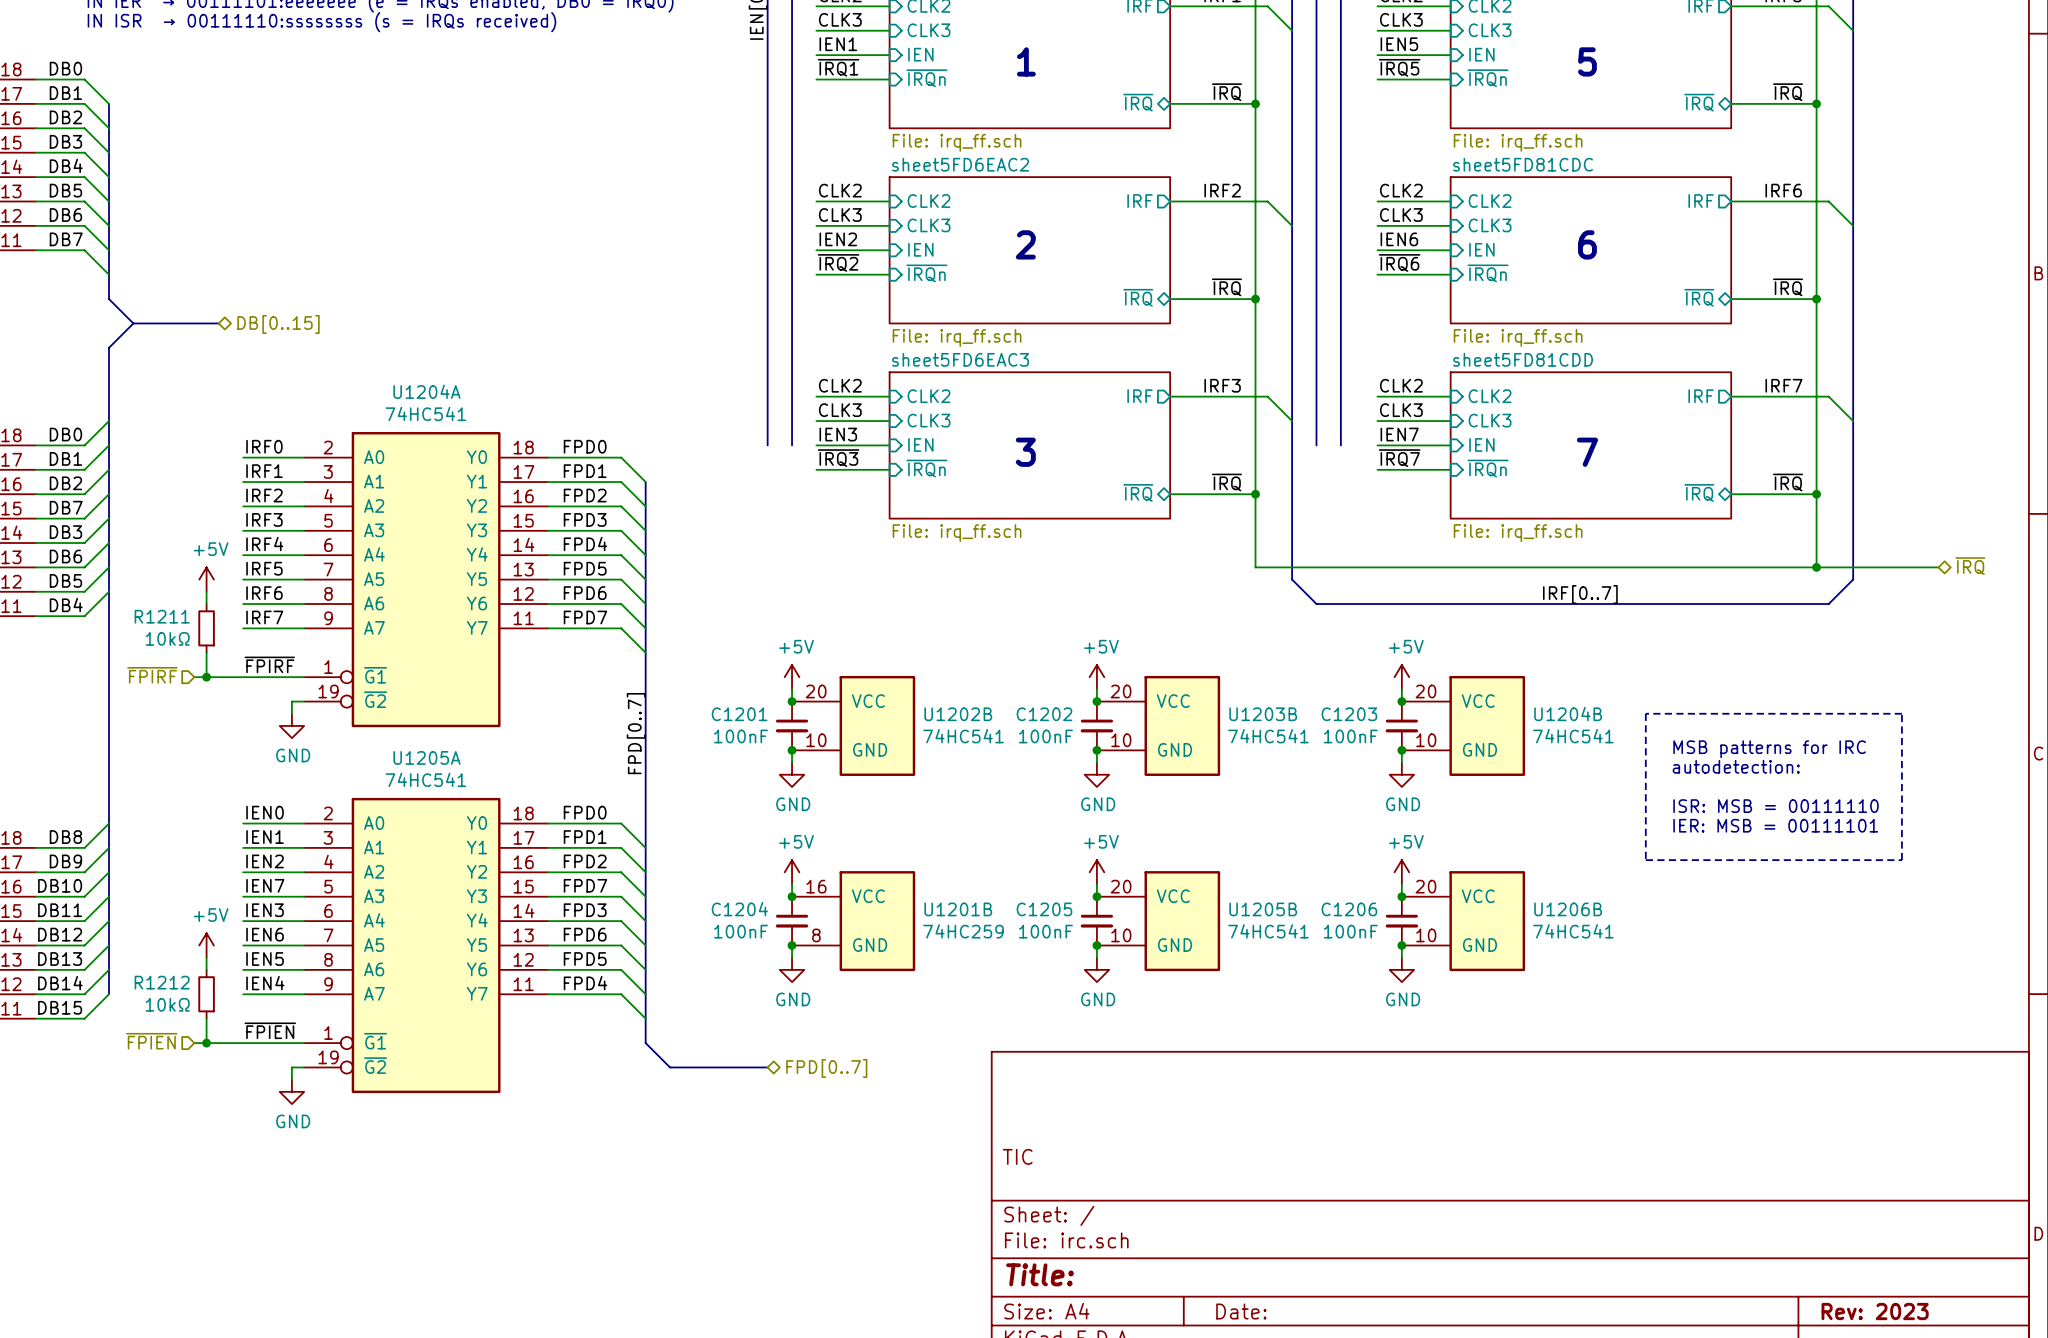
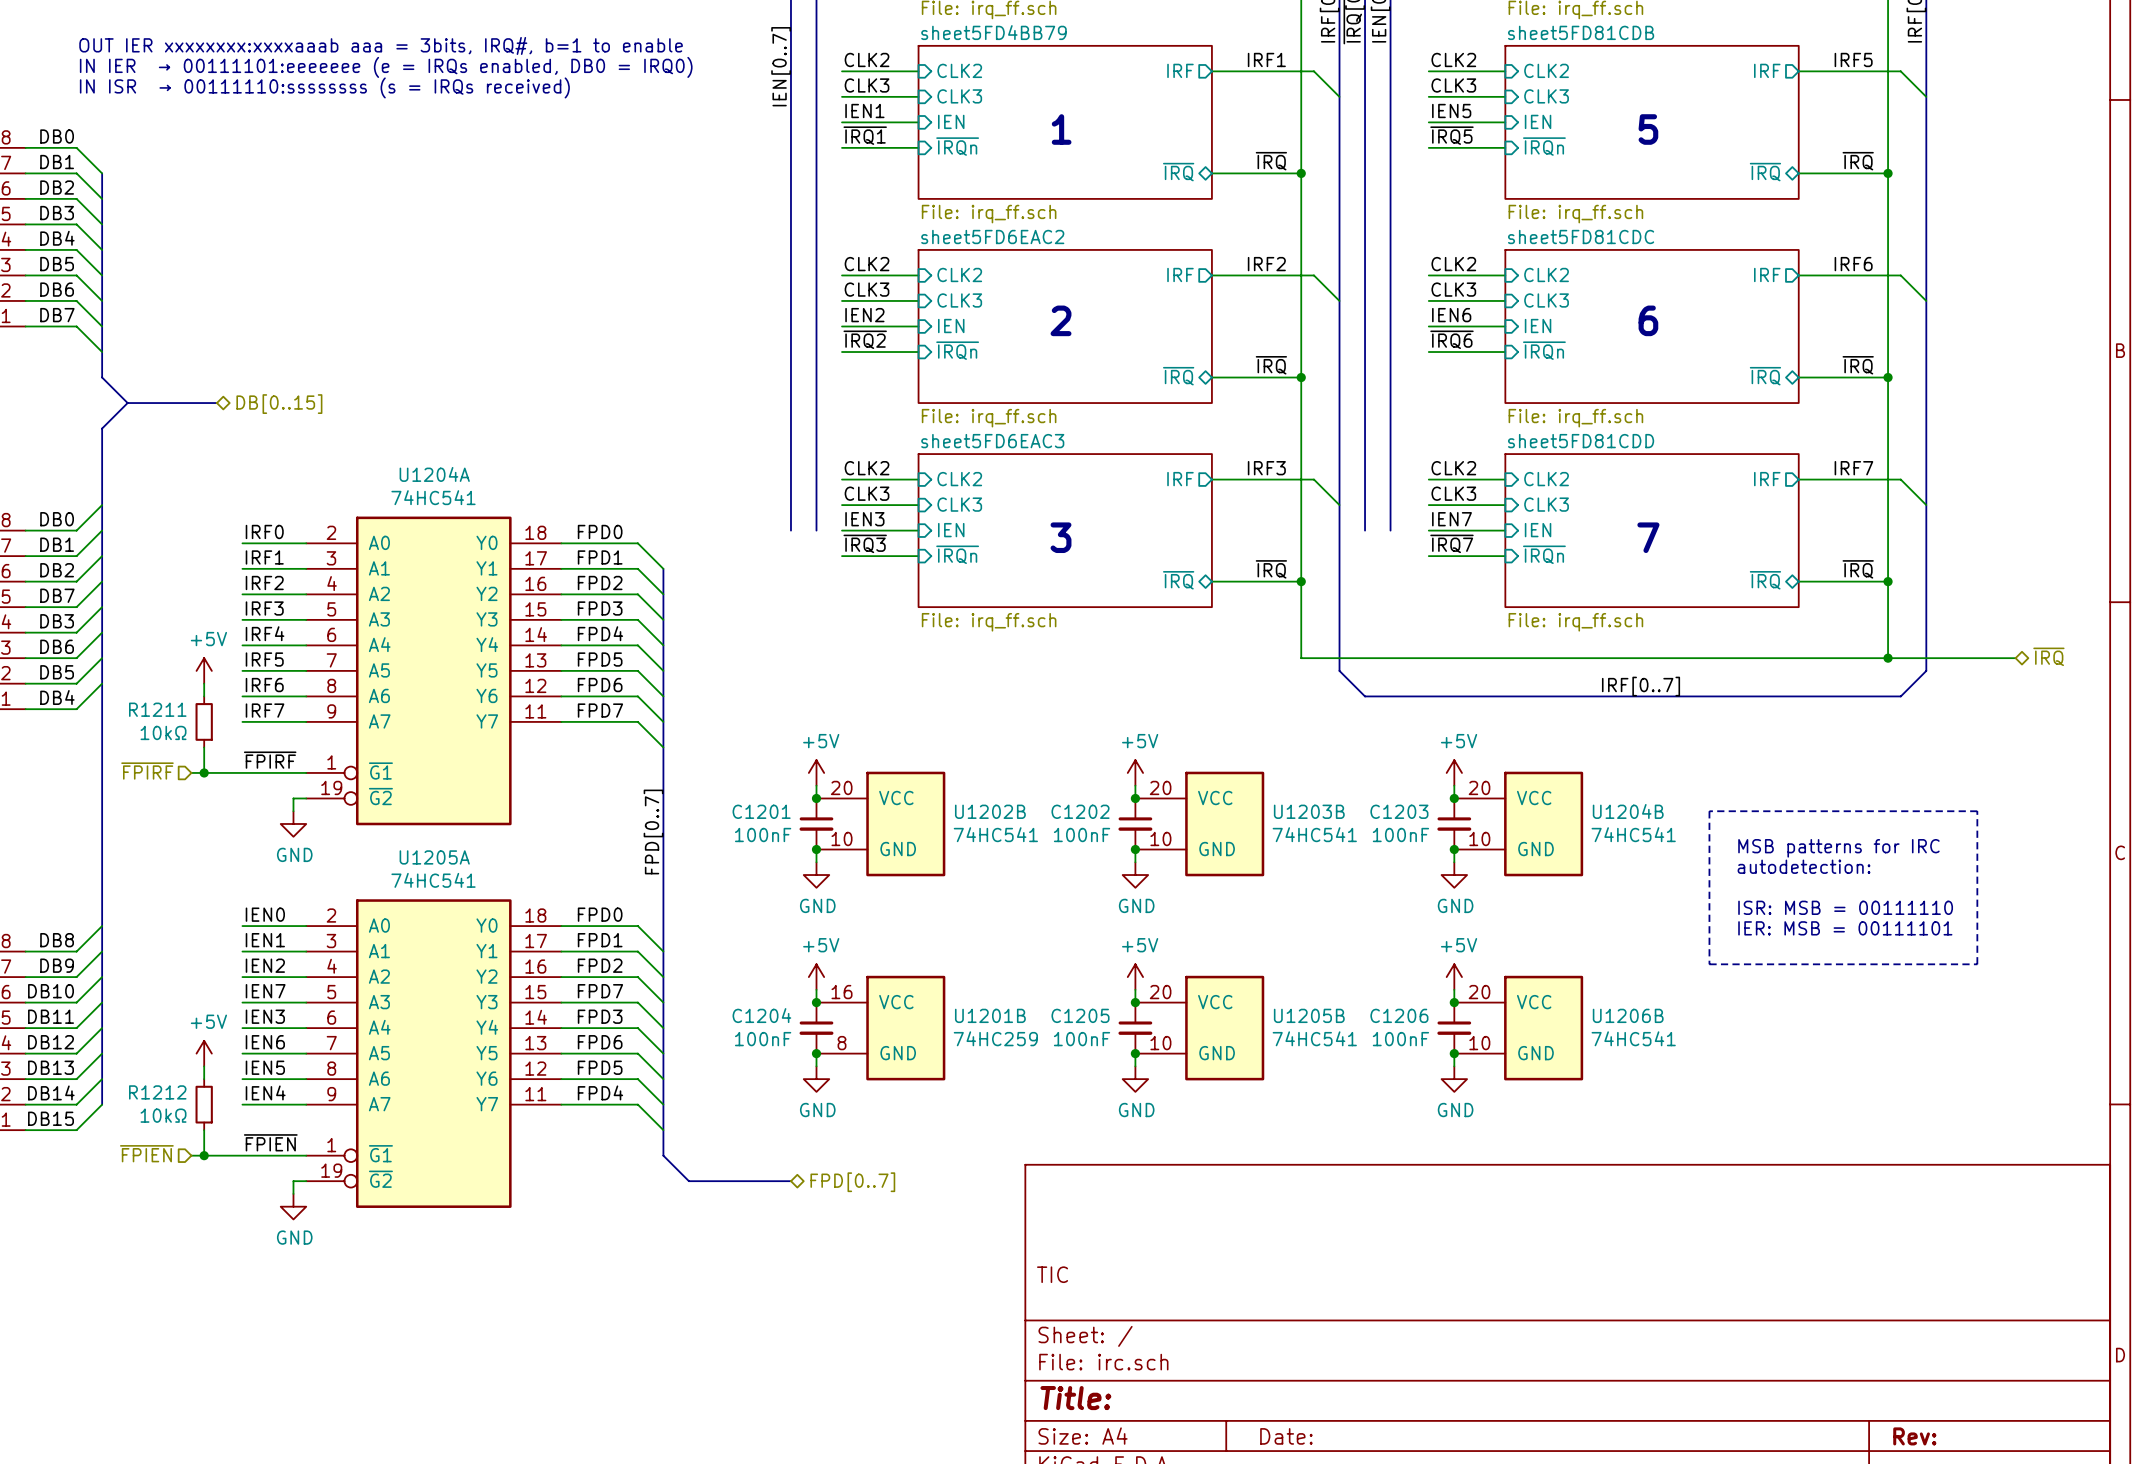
title block: Rev: 2023 (1875, 1311) -> Rev: (1914, 1436)

